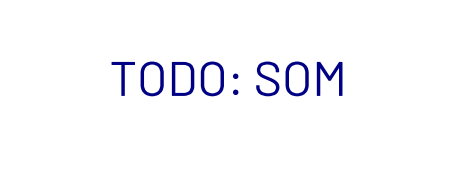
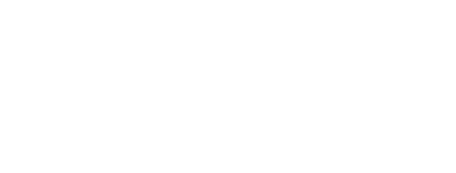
text: TODO: SOM (227, 78) -> none

